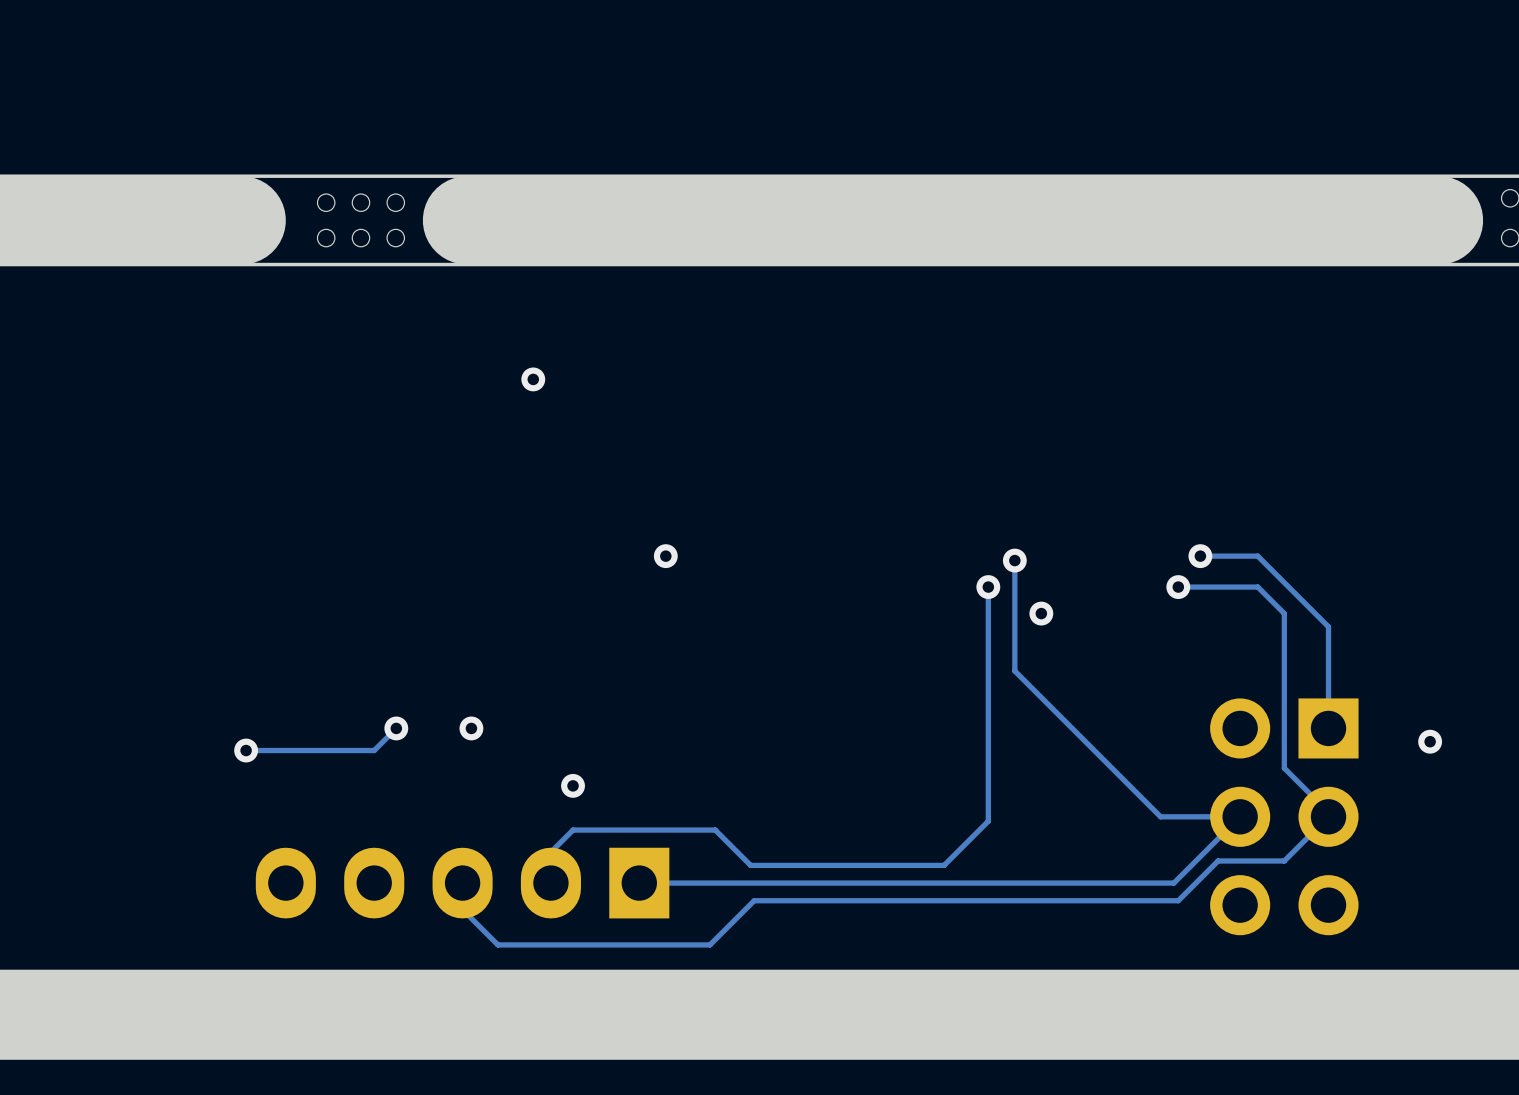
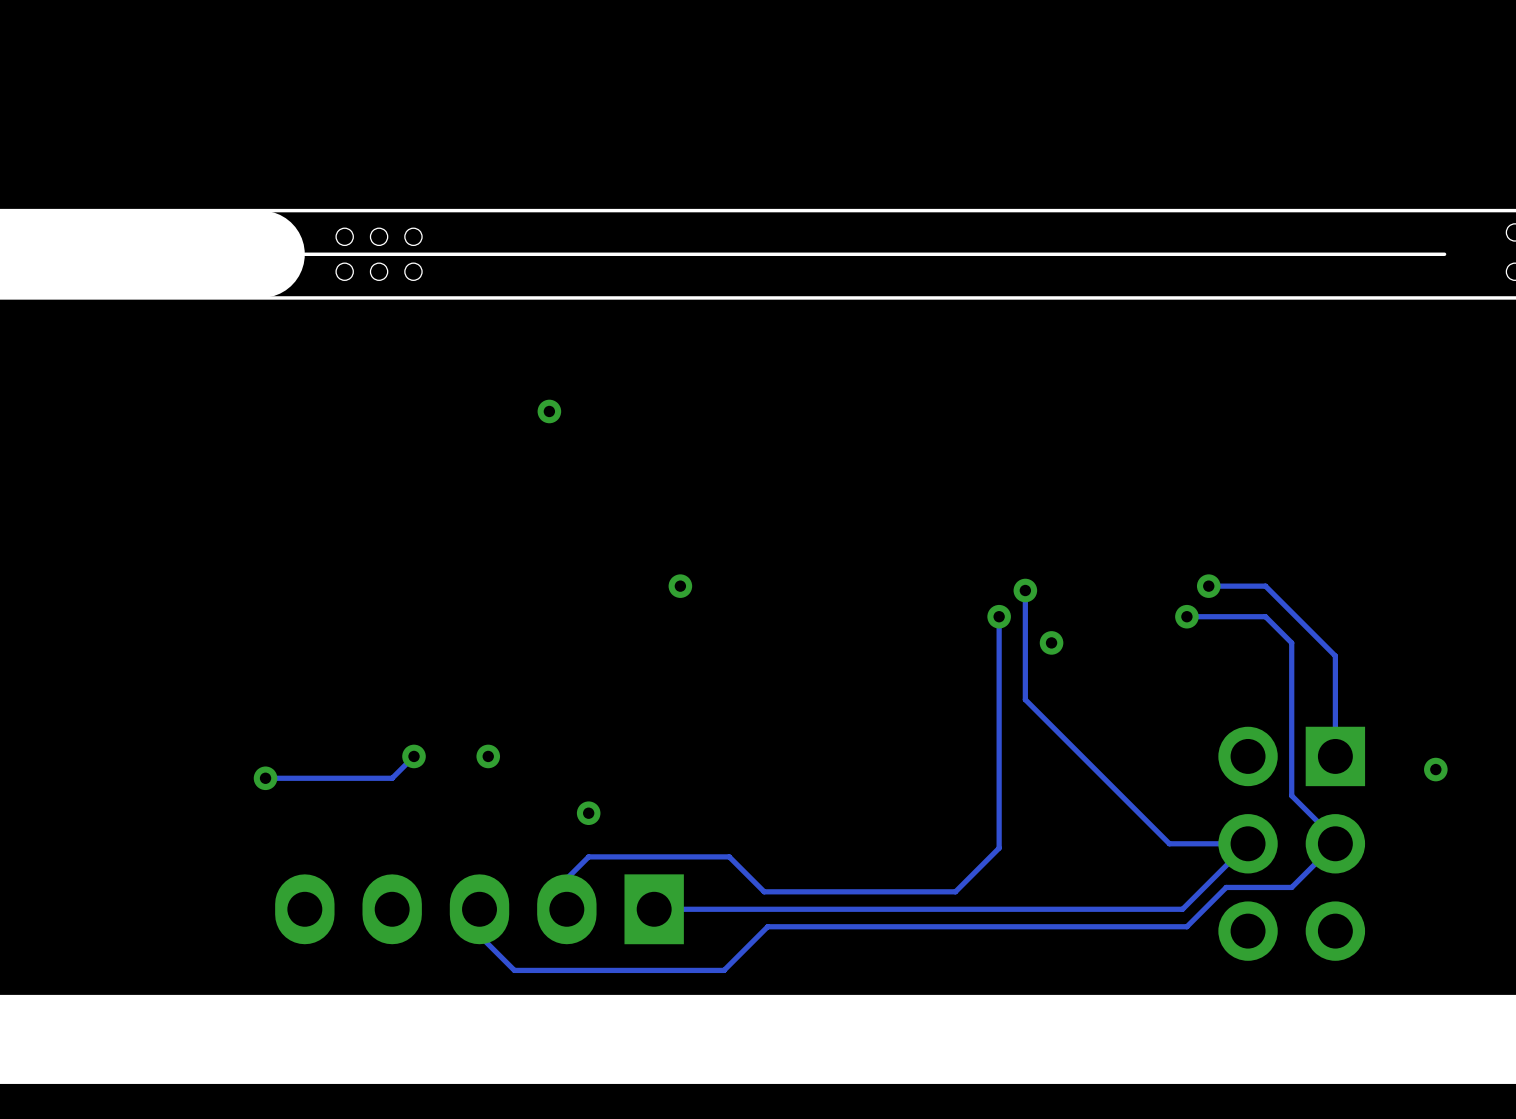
board edge: none -> (483, 254) (261, 254)
board edge width: thick (1438, 220) (467, 220) -> thin (1444, 254) (483, 254)

